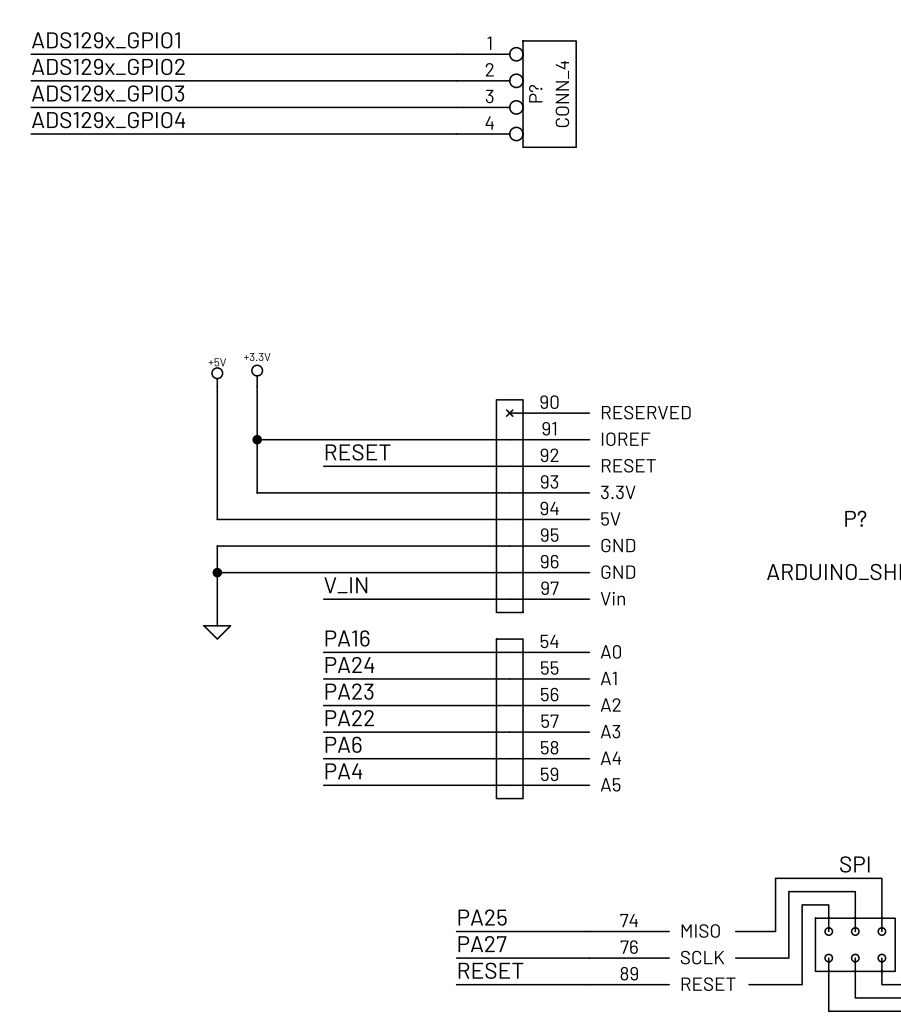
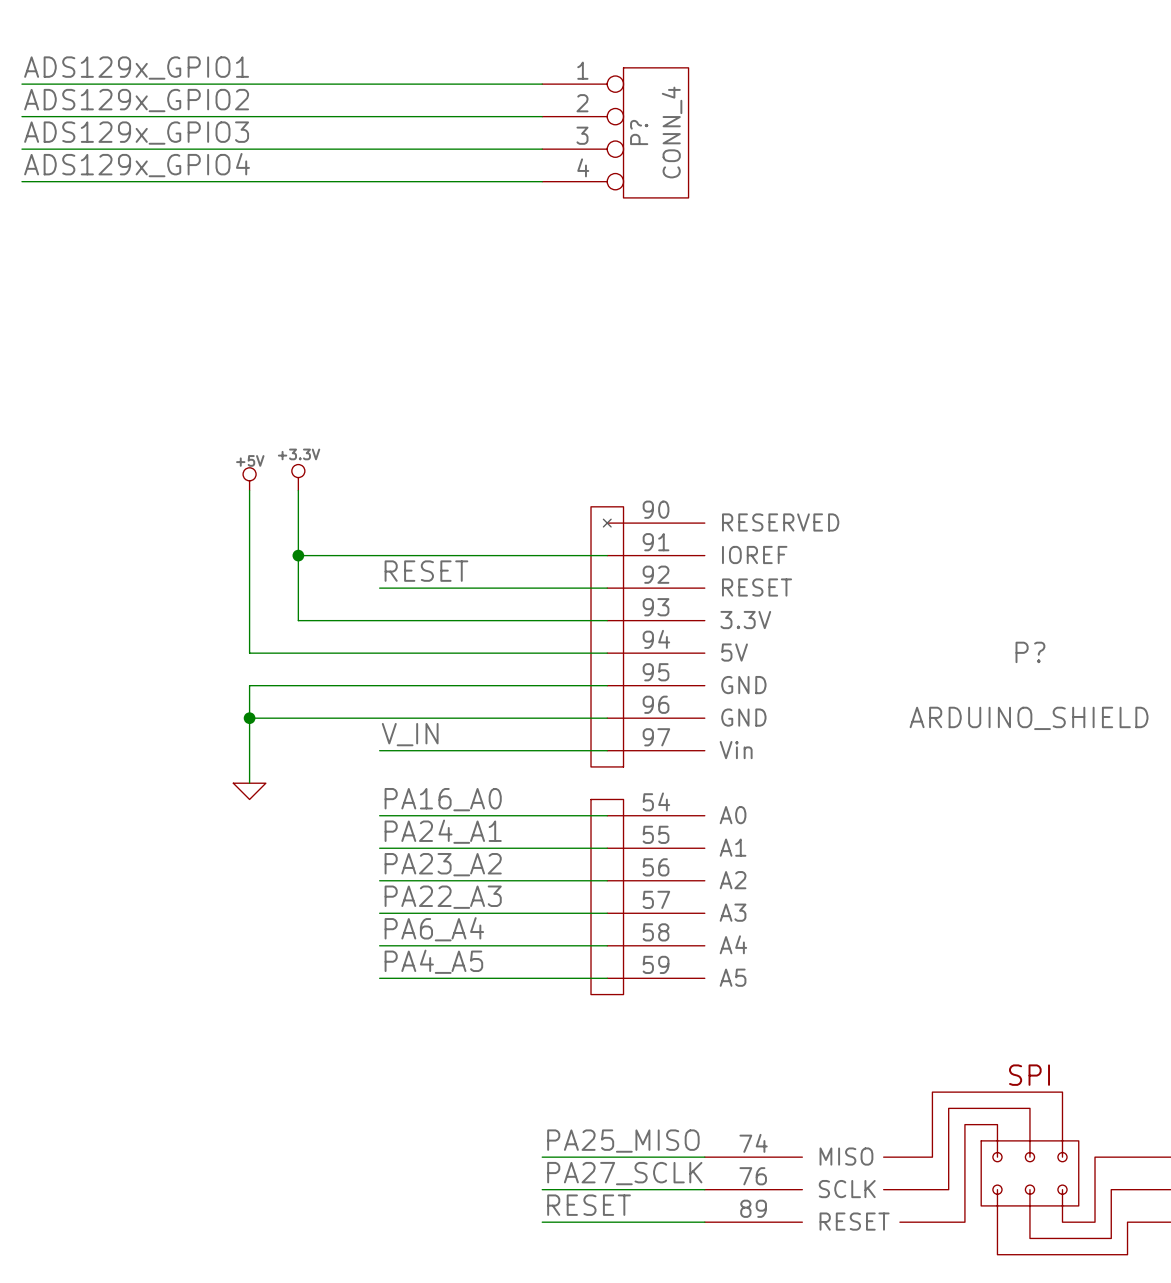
label: PA16 (347, 638) -> PA16_A0 (443, 799)
label: PA24 (349, 664) -> PA24_A1 (443, 831)
label: PA23 (349, 691) -> PA23_A2 (443, 864)
label: PA22 (349, 718) -> PA22_A3 (443, 897)
label: PA6 (343, 744) -> PA6_A4 (434, 929)
label: PA4 (343, 771) -> PA4_A5 (433, 961)
label: PA25 (482, 917) -> PA25_MISO (623, 1141)
label: PA27 (482, 944) -> PA27_SCLK (624, 1173)

